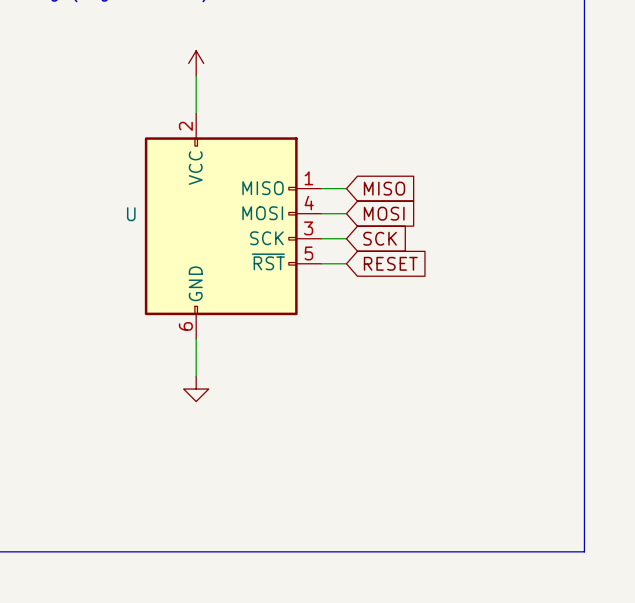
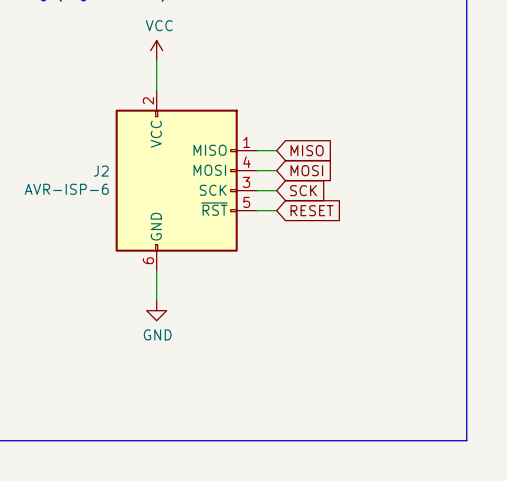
power symbol text: none -> VCC (159, 25)
U name: U (131, 214) -> J2 (101, 171)
U value: none -> AVR-ISP-6 (66, 189)
power symbol text: none -> GND (157, 334)

